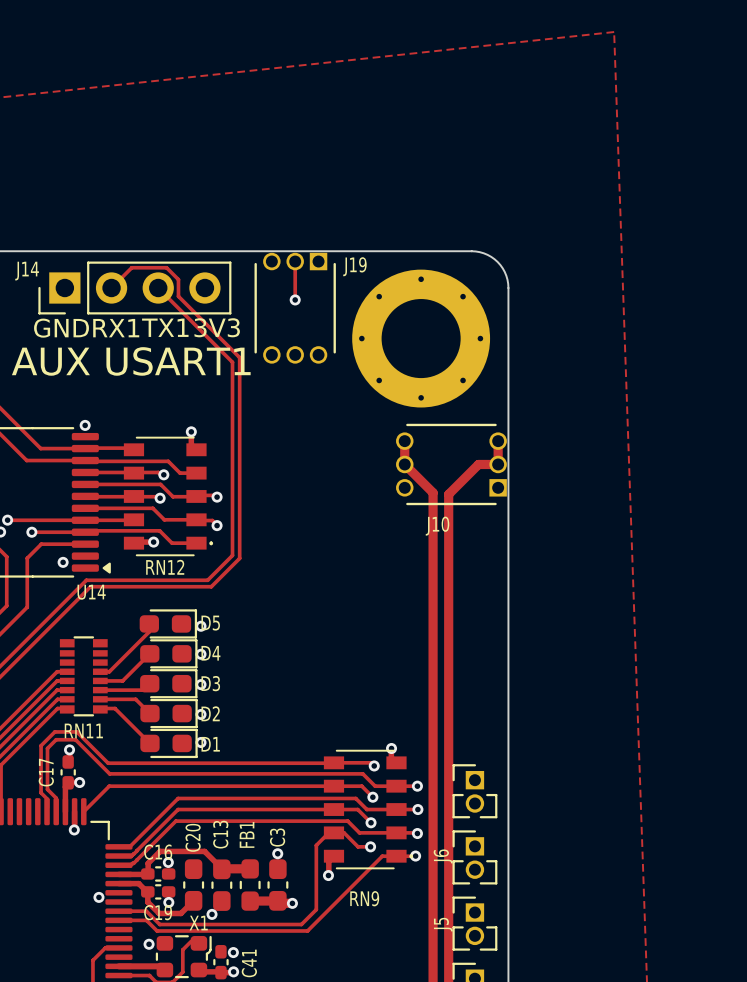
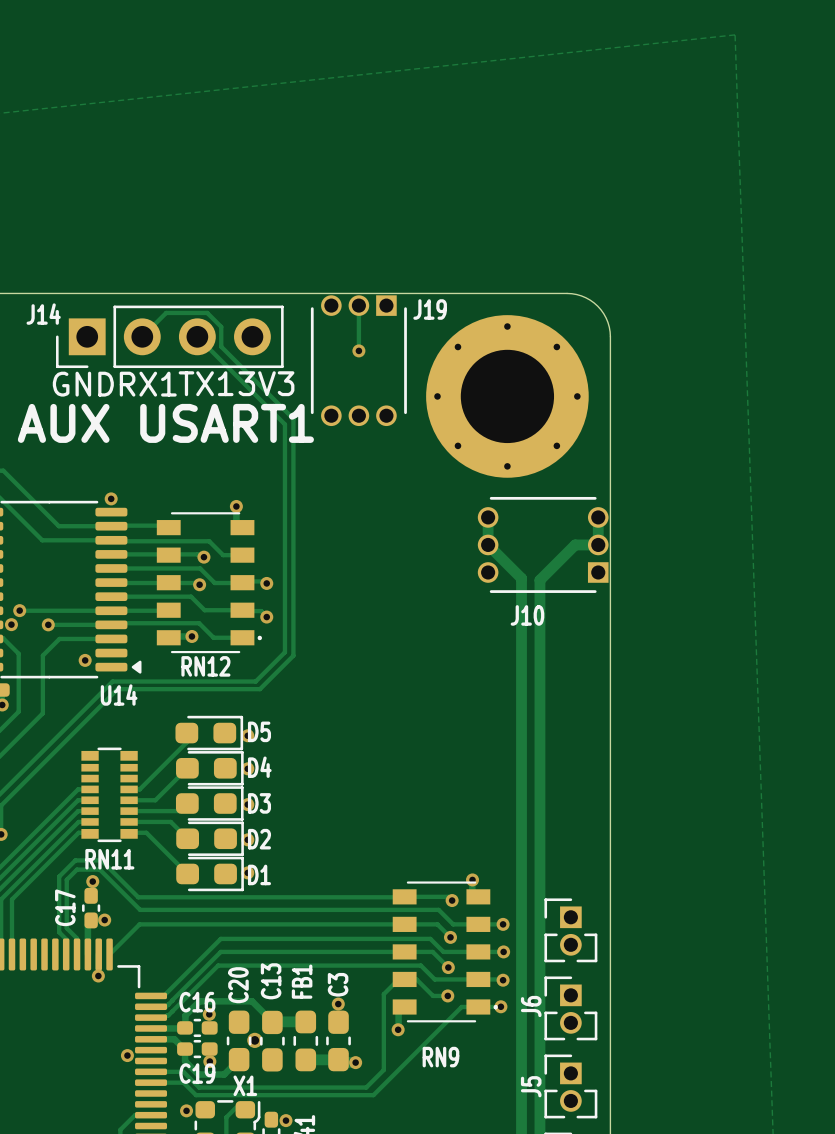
via: none -> (254, 1040)
via: (212, 914) -> none

